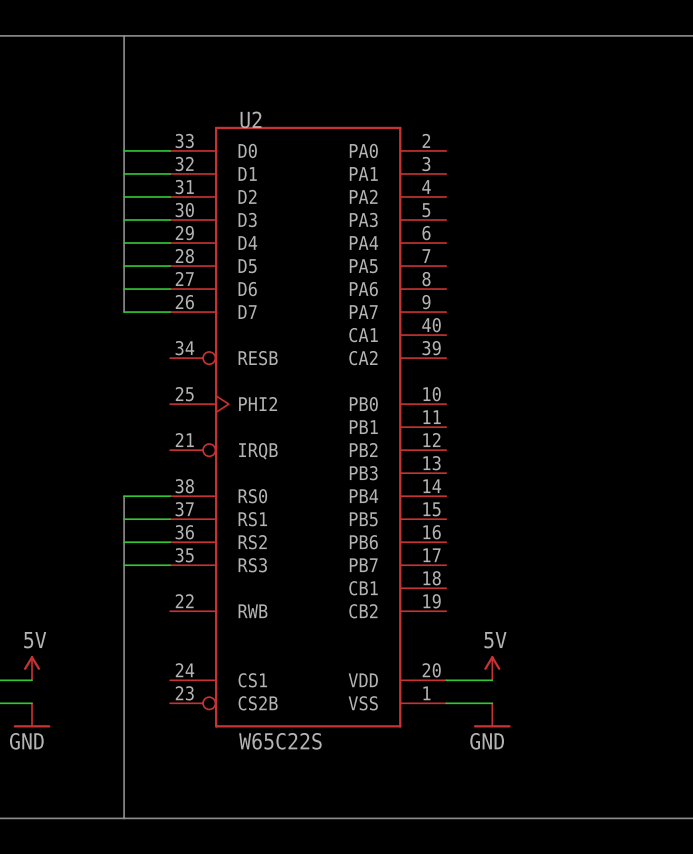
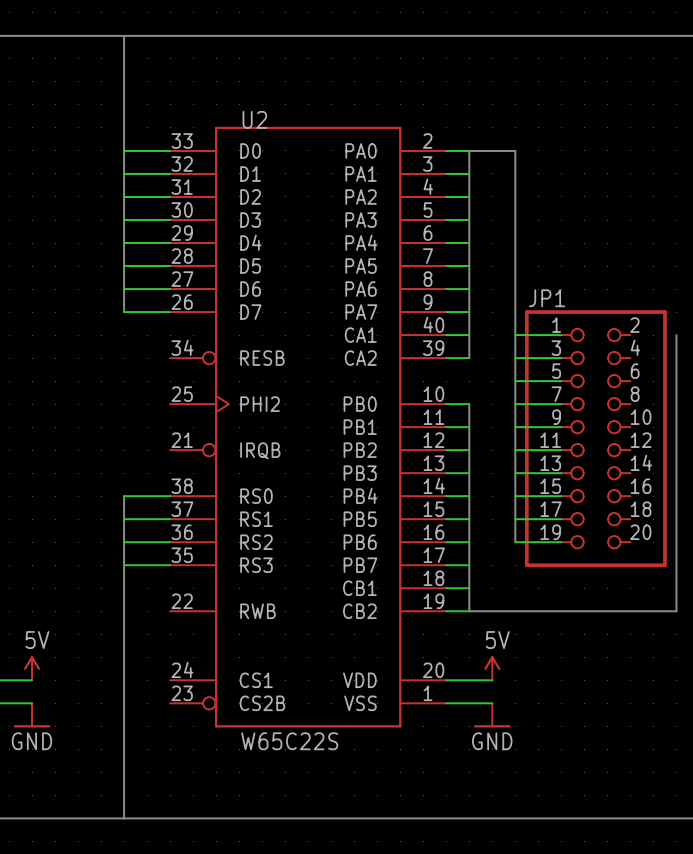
wire: none -> (446, 150) (469, 150)
wire: none -> (446, 173) (469, 173)
wire: none -> (446, 196) (469, 196)
wire: none -> (446, 220) (469, 220)
wire: none -> (446, 243) (469, 243)
wire: none -> (446, 266) (469, 266)
wire: none -> (446, 289) (469, 289)
wire: none -> (446, 312) (469, 312)
wire: none -> (446, 335) (469, 335)
wire: none -> (515, 335) (561, 335)
bus: none -> (676, 335) (676, 611) (469, 611) (469, 404)
wire: none -> (446, 358) (469, 358)
bus: none -> (469, 358) (469, 150) (515, 150) (515, 542)
wire: none -> (515, 358) (561, 358)
wire: none -> (515, 381) (561, 381)
wire: none -> (446, 404) (469, 404)
wire: none -> (515, 404) (561, 404)
wire: none -> (446, 427) (469, 427)
wire: none -> (515, 427) (561, 427)
JP1: none -> (595, 438)
wire: none -> (446, 450) (469, 450)
wire: none -> (515, 450) (561, 450)
wire: none -> (446, 473) (469, 473)
wire: none -> (515, 473) (561, 473)
wire: none -> (446, 496) (469, 496)
wire: none -> (515, 496) (561, 496)
wire: none -> (446, 519) (469, 519)
wire: none -> (515, 519) (561, 519)
wire: none -> (446, 542) (469, 542)
wire: none -> (515, 542) (561, 542)
wire: none -> (446, 565) (469, 565)
wire: none -> (446, 588) (469, 588)
wire: none -> (446, 611) (469, 611)

